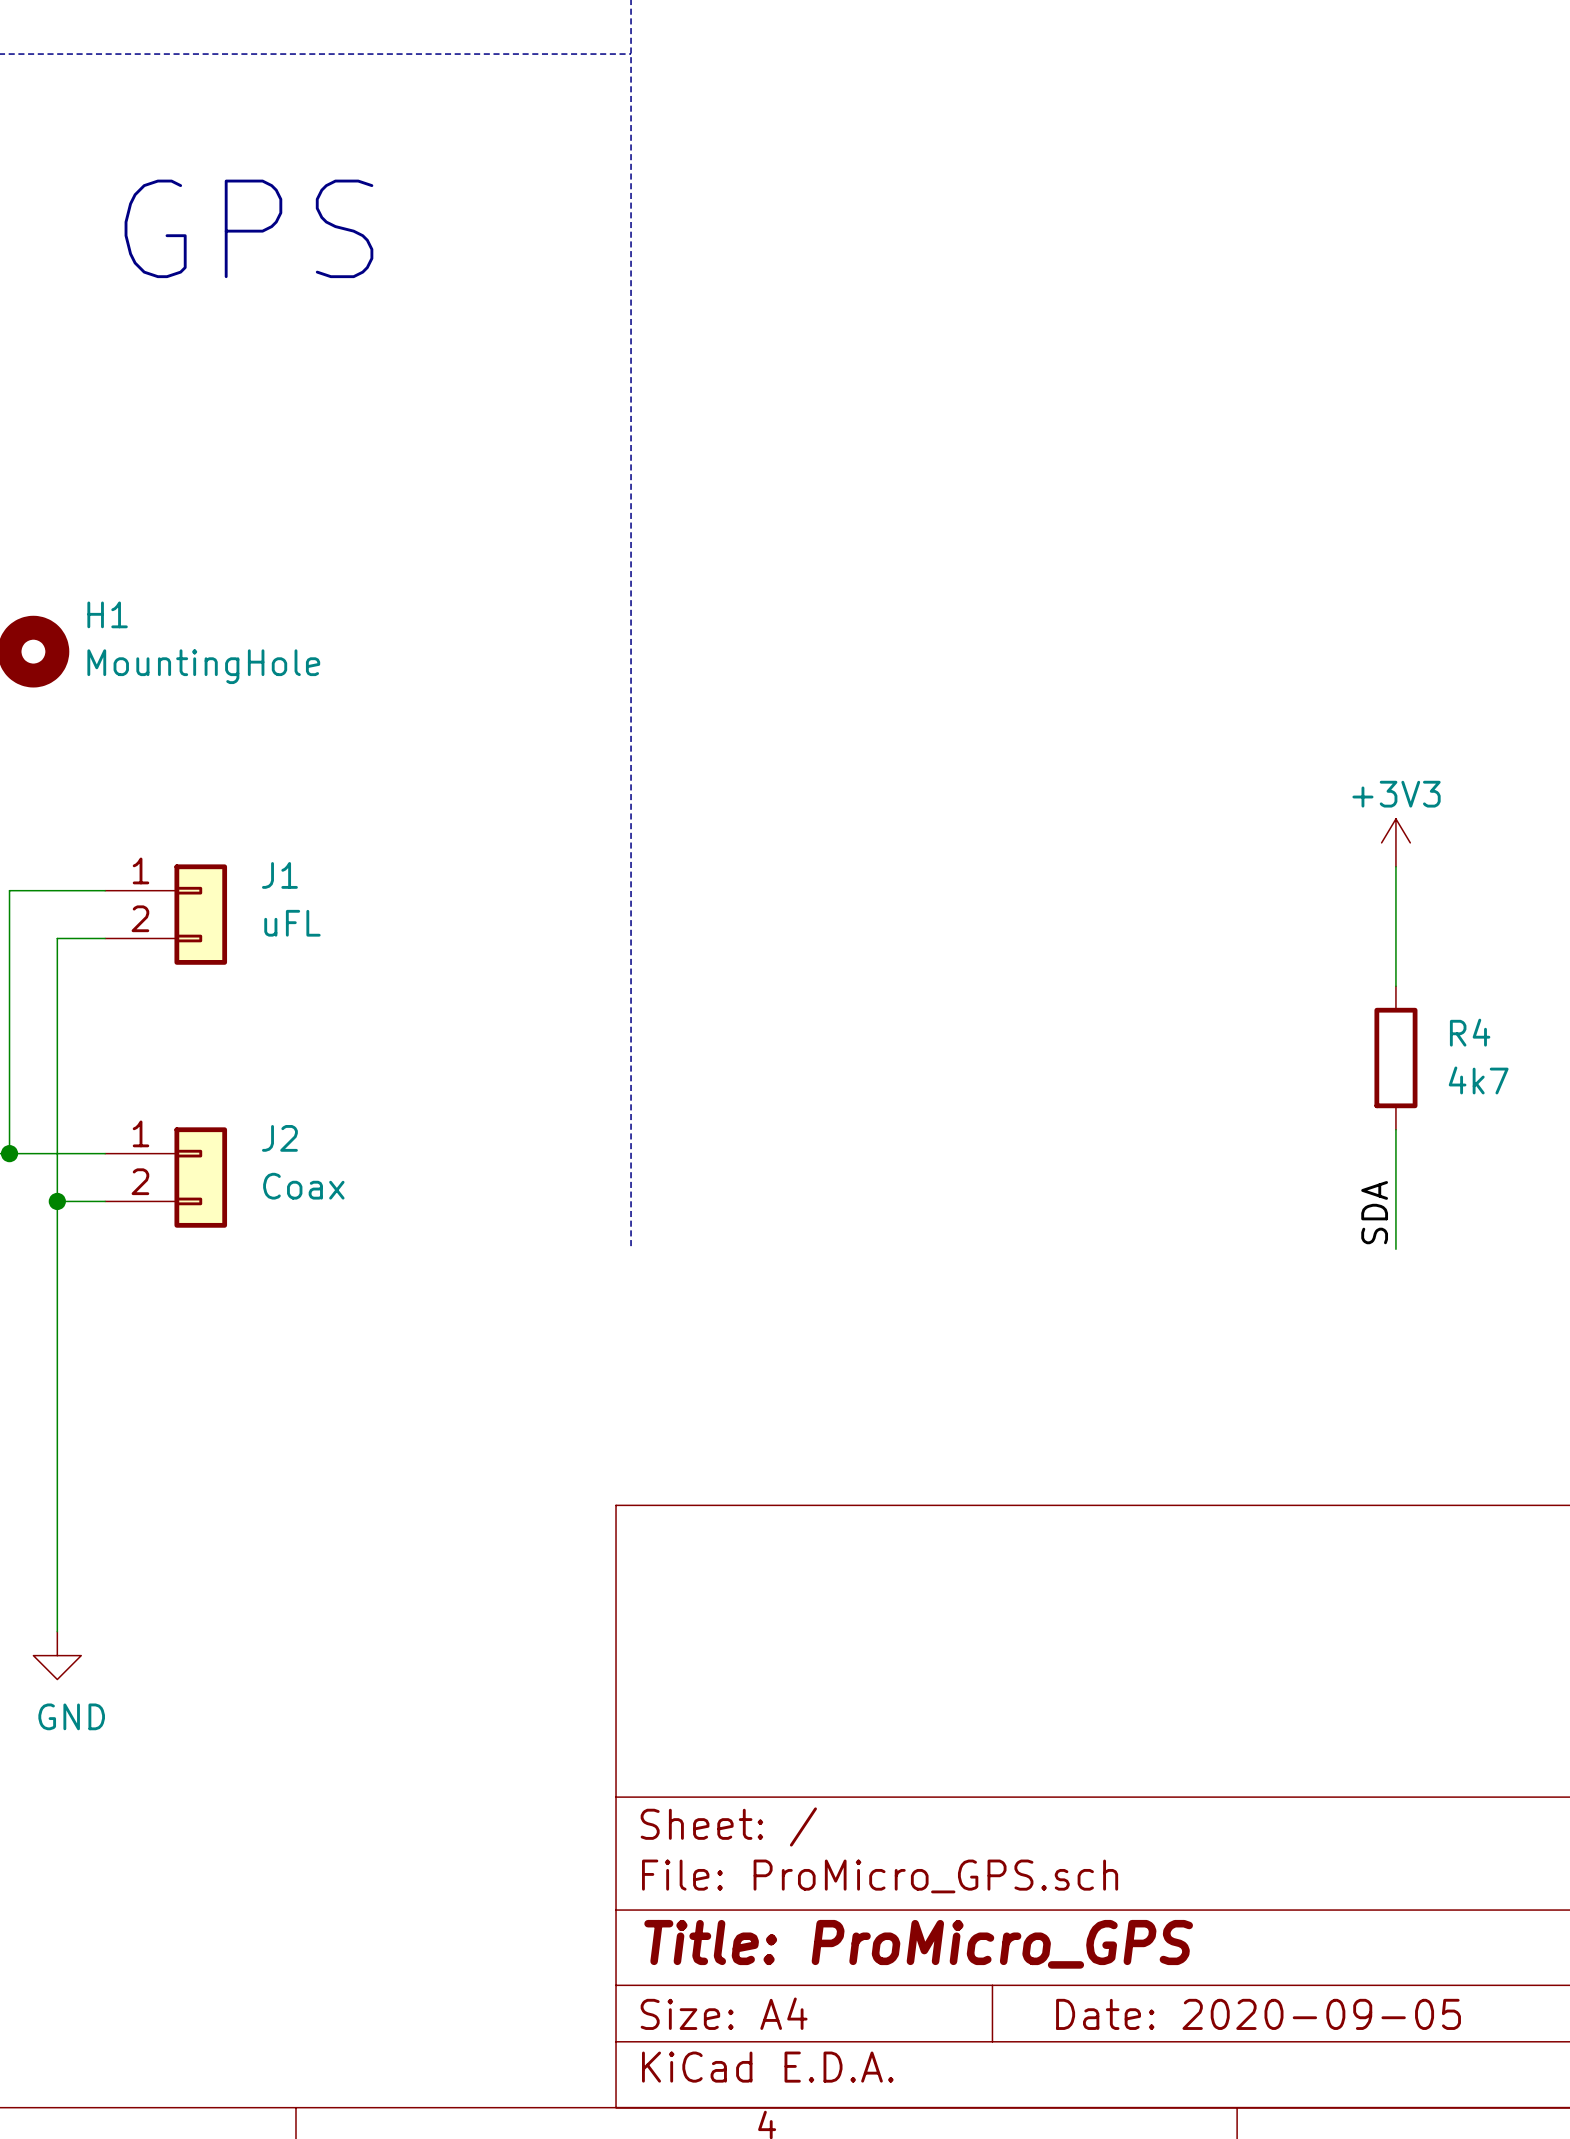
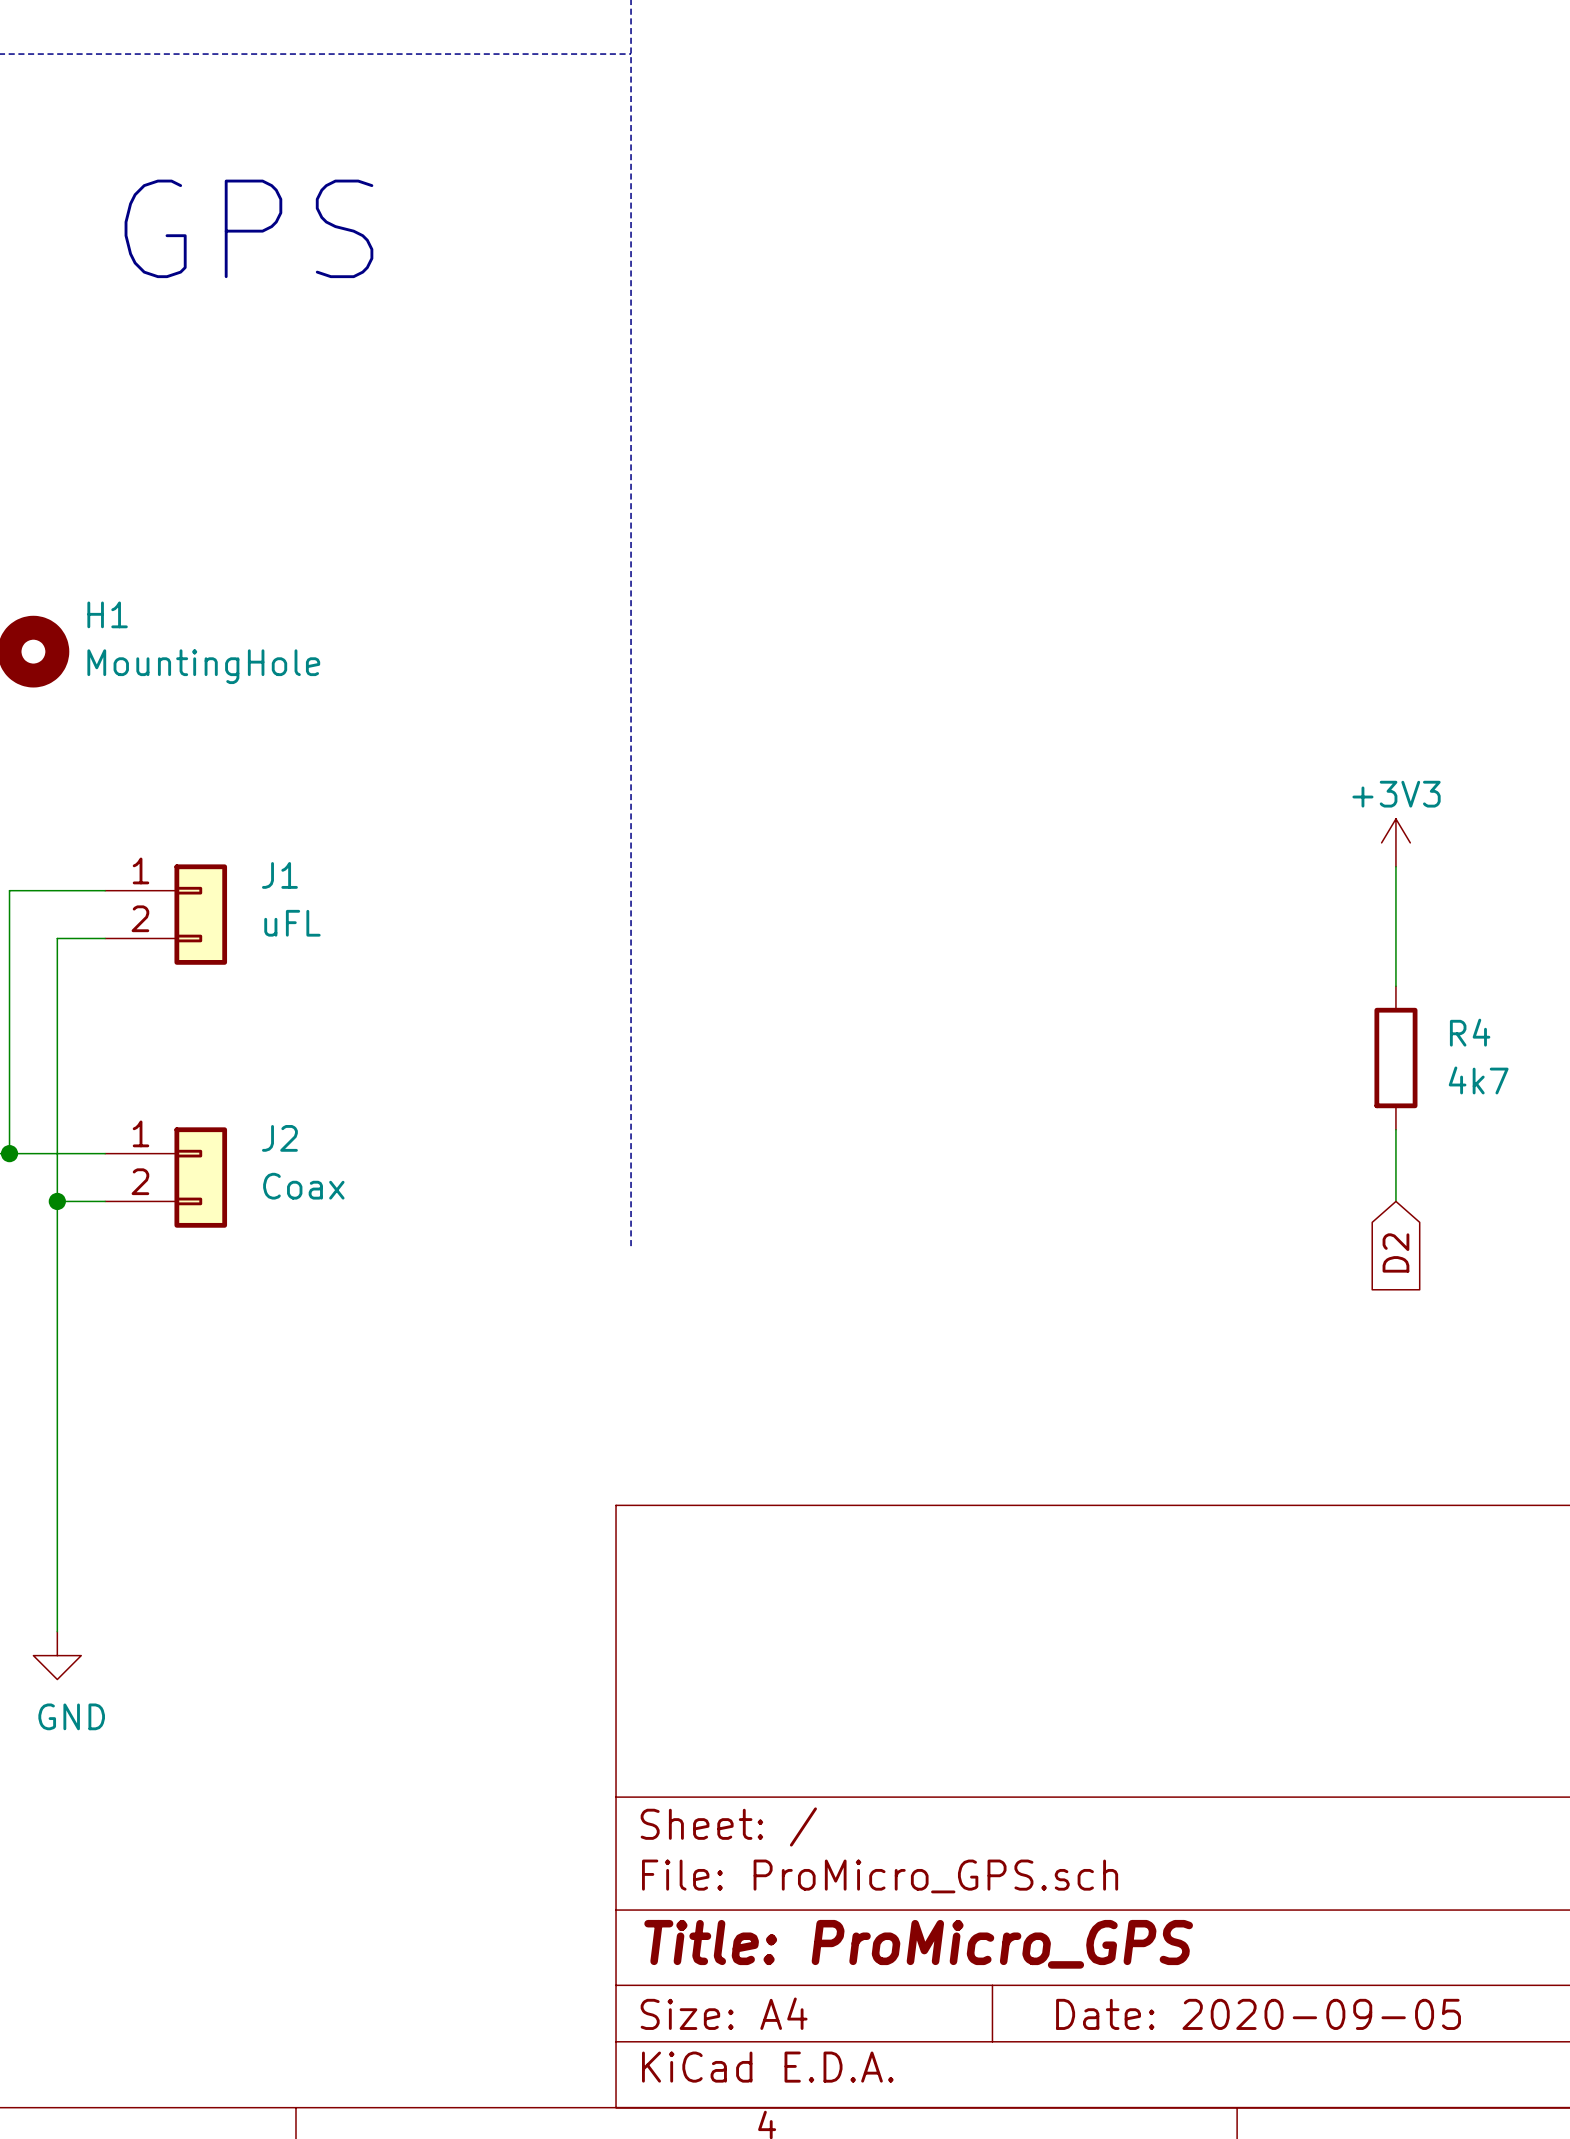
wire: (1395, 1201) (1395, 1249) -> none
label: SDA (1374, 1212) -> none
global label: none -> D2 (1395, 1252)

